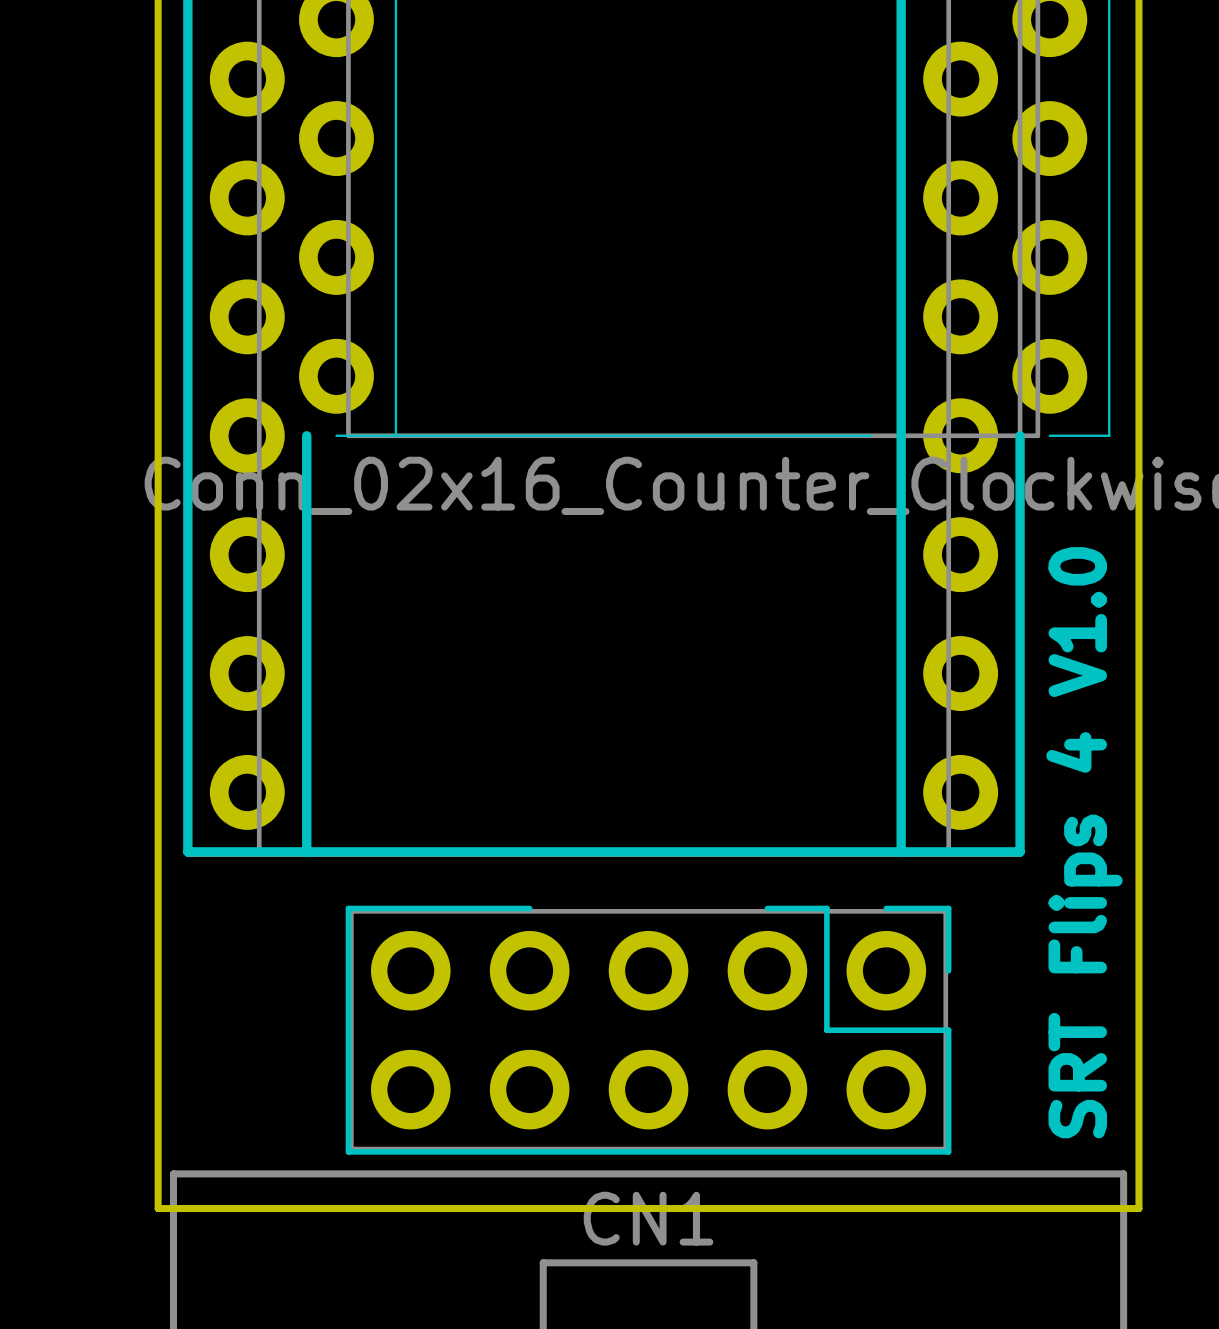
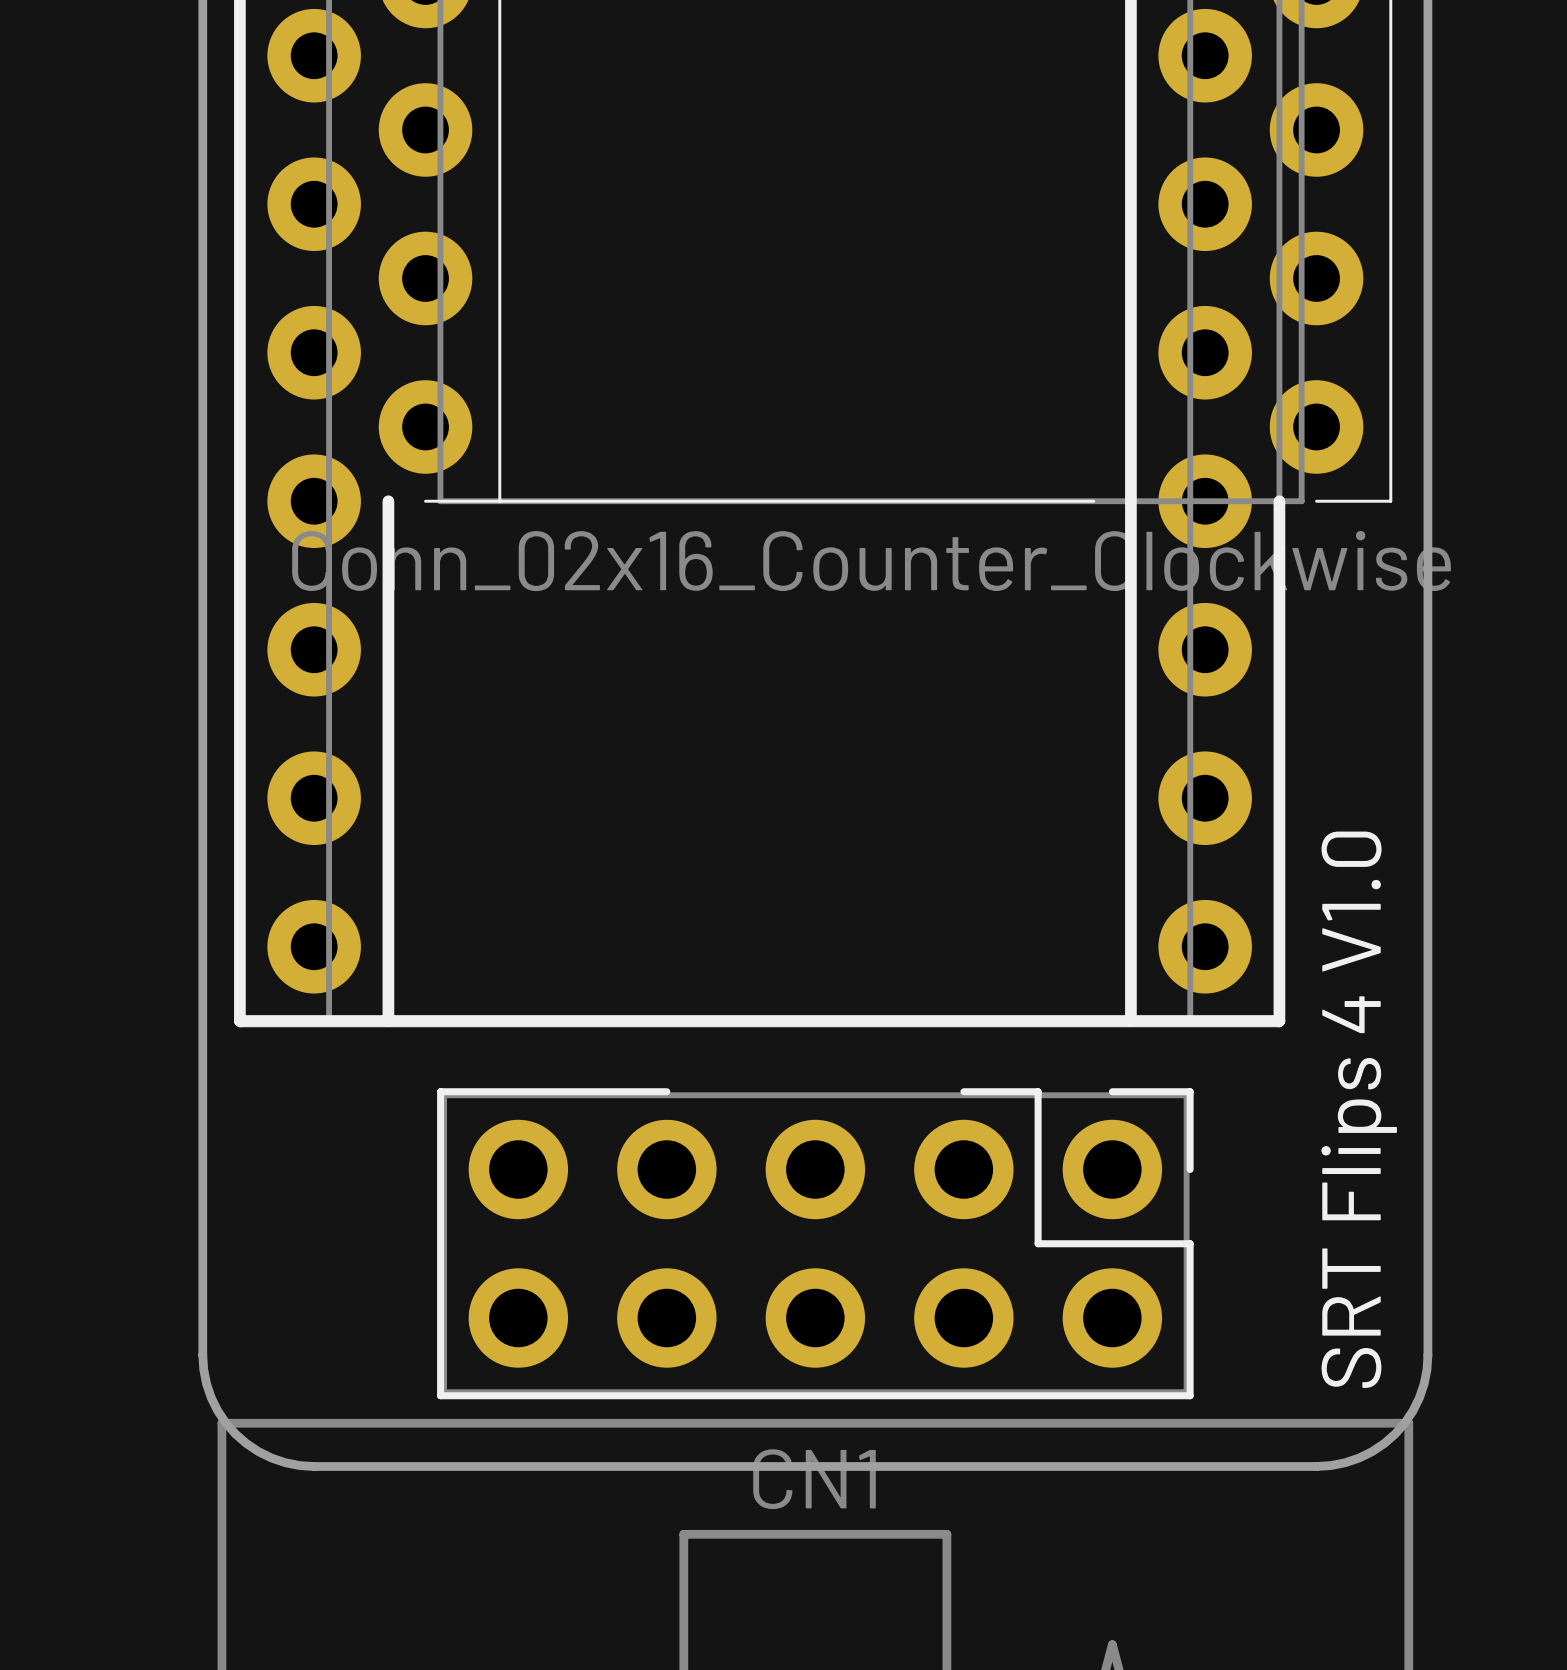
board edge: (158, 1119) (158, 1208) (247, 1208) -> (202, 1355) (203, 1369) (211, 1397) (217, 1410) (235, 1433) (258, 1451) (271, 1458) (299, 1465) (314, 1466)
board edge: (1138, 1119) (1138, 1208) (1049, 1208) -> (1427, 1355) (1426, 1369) (1419, 1397) (1413, 1410) (1395, 1433) (1384, 1443) (1359, 1458) (1331, 1465) (1316, 1466)

